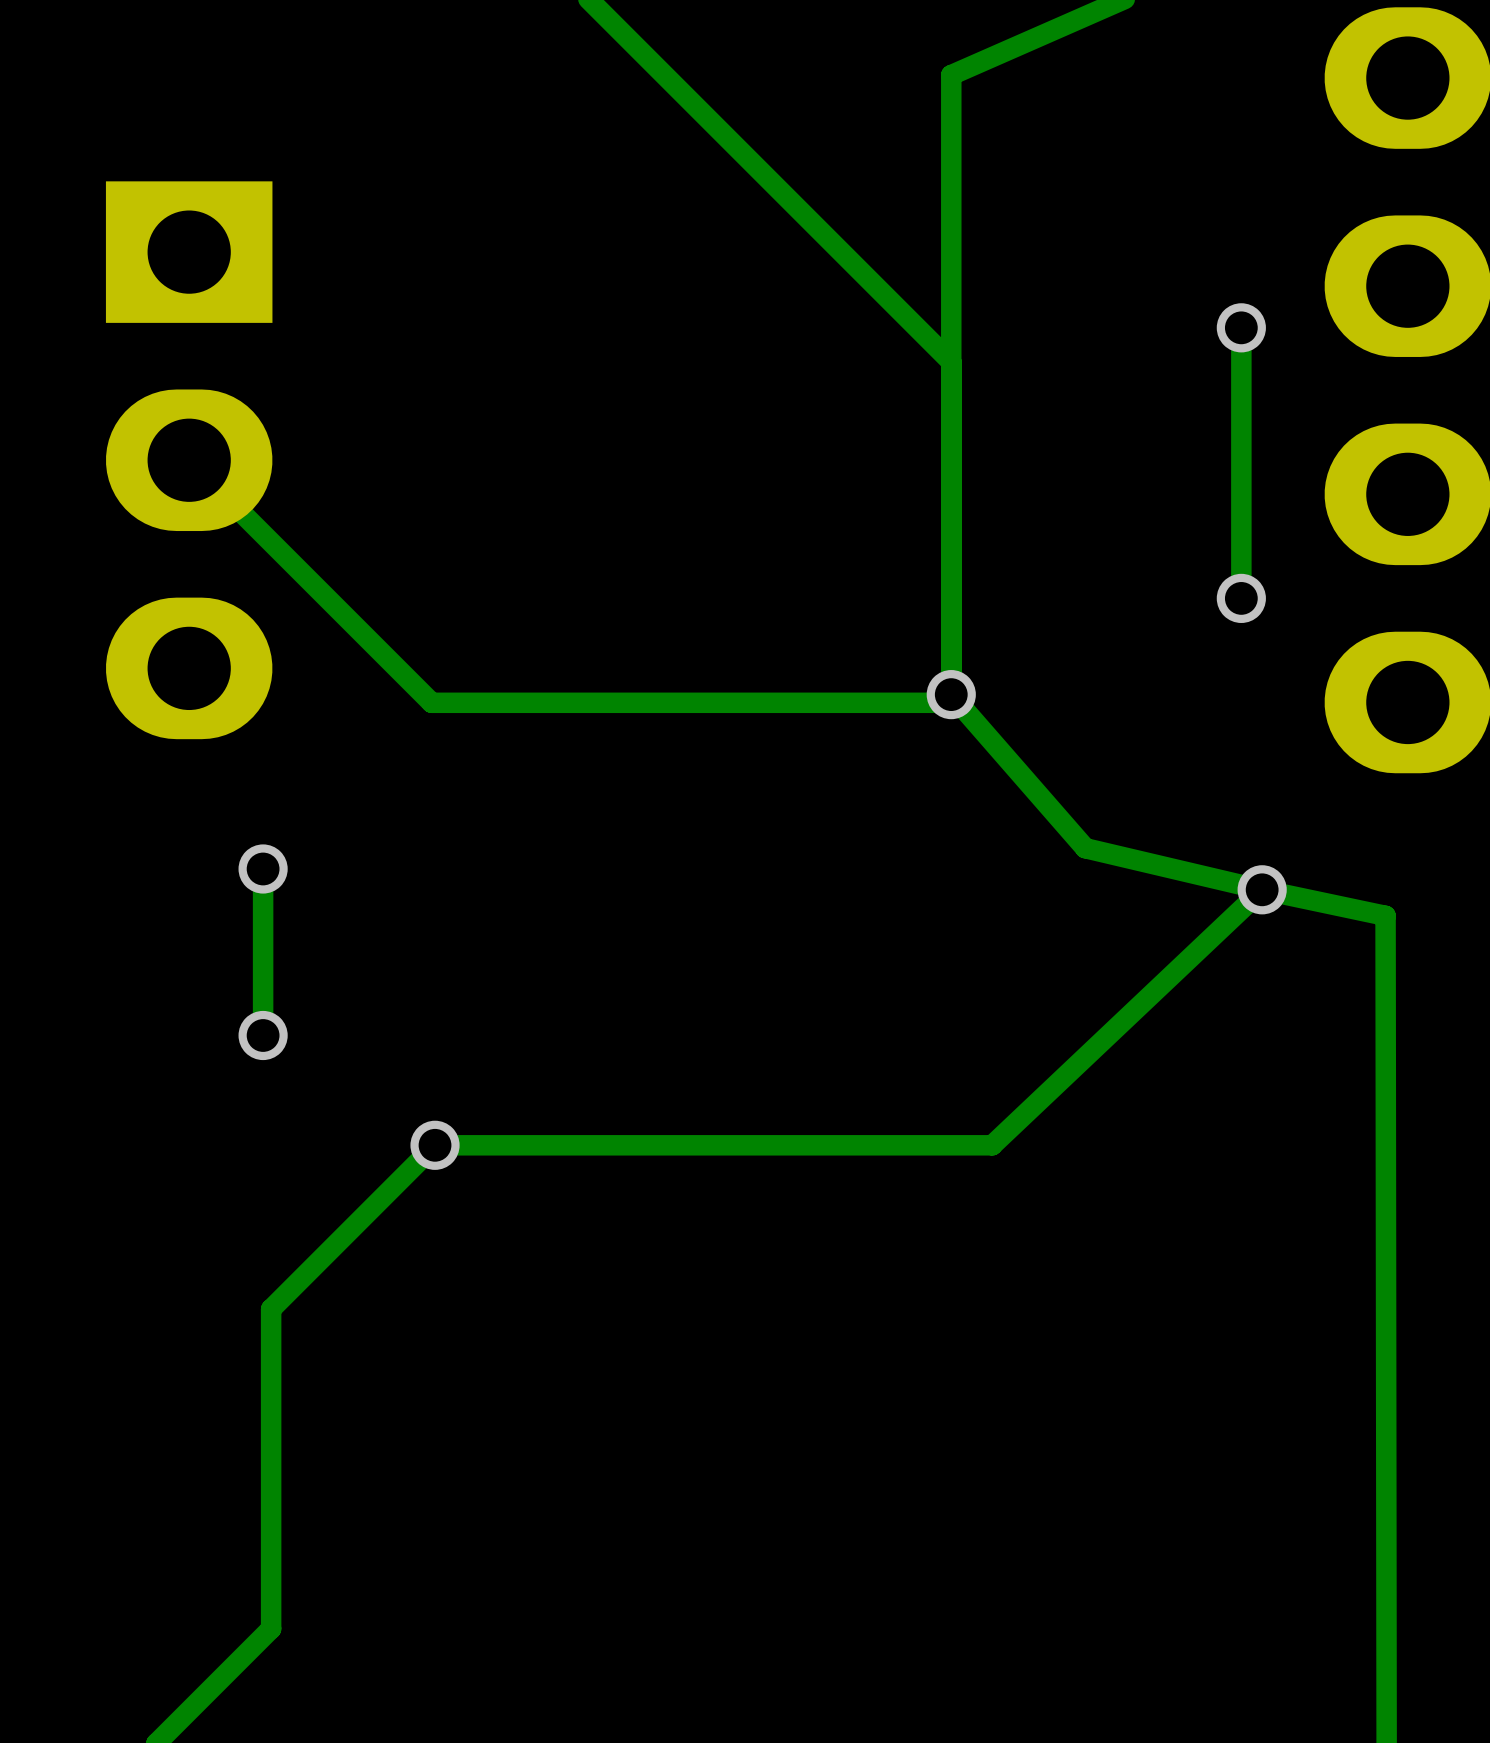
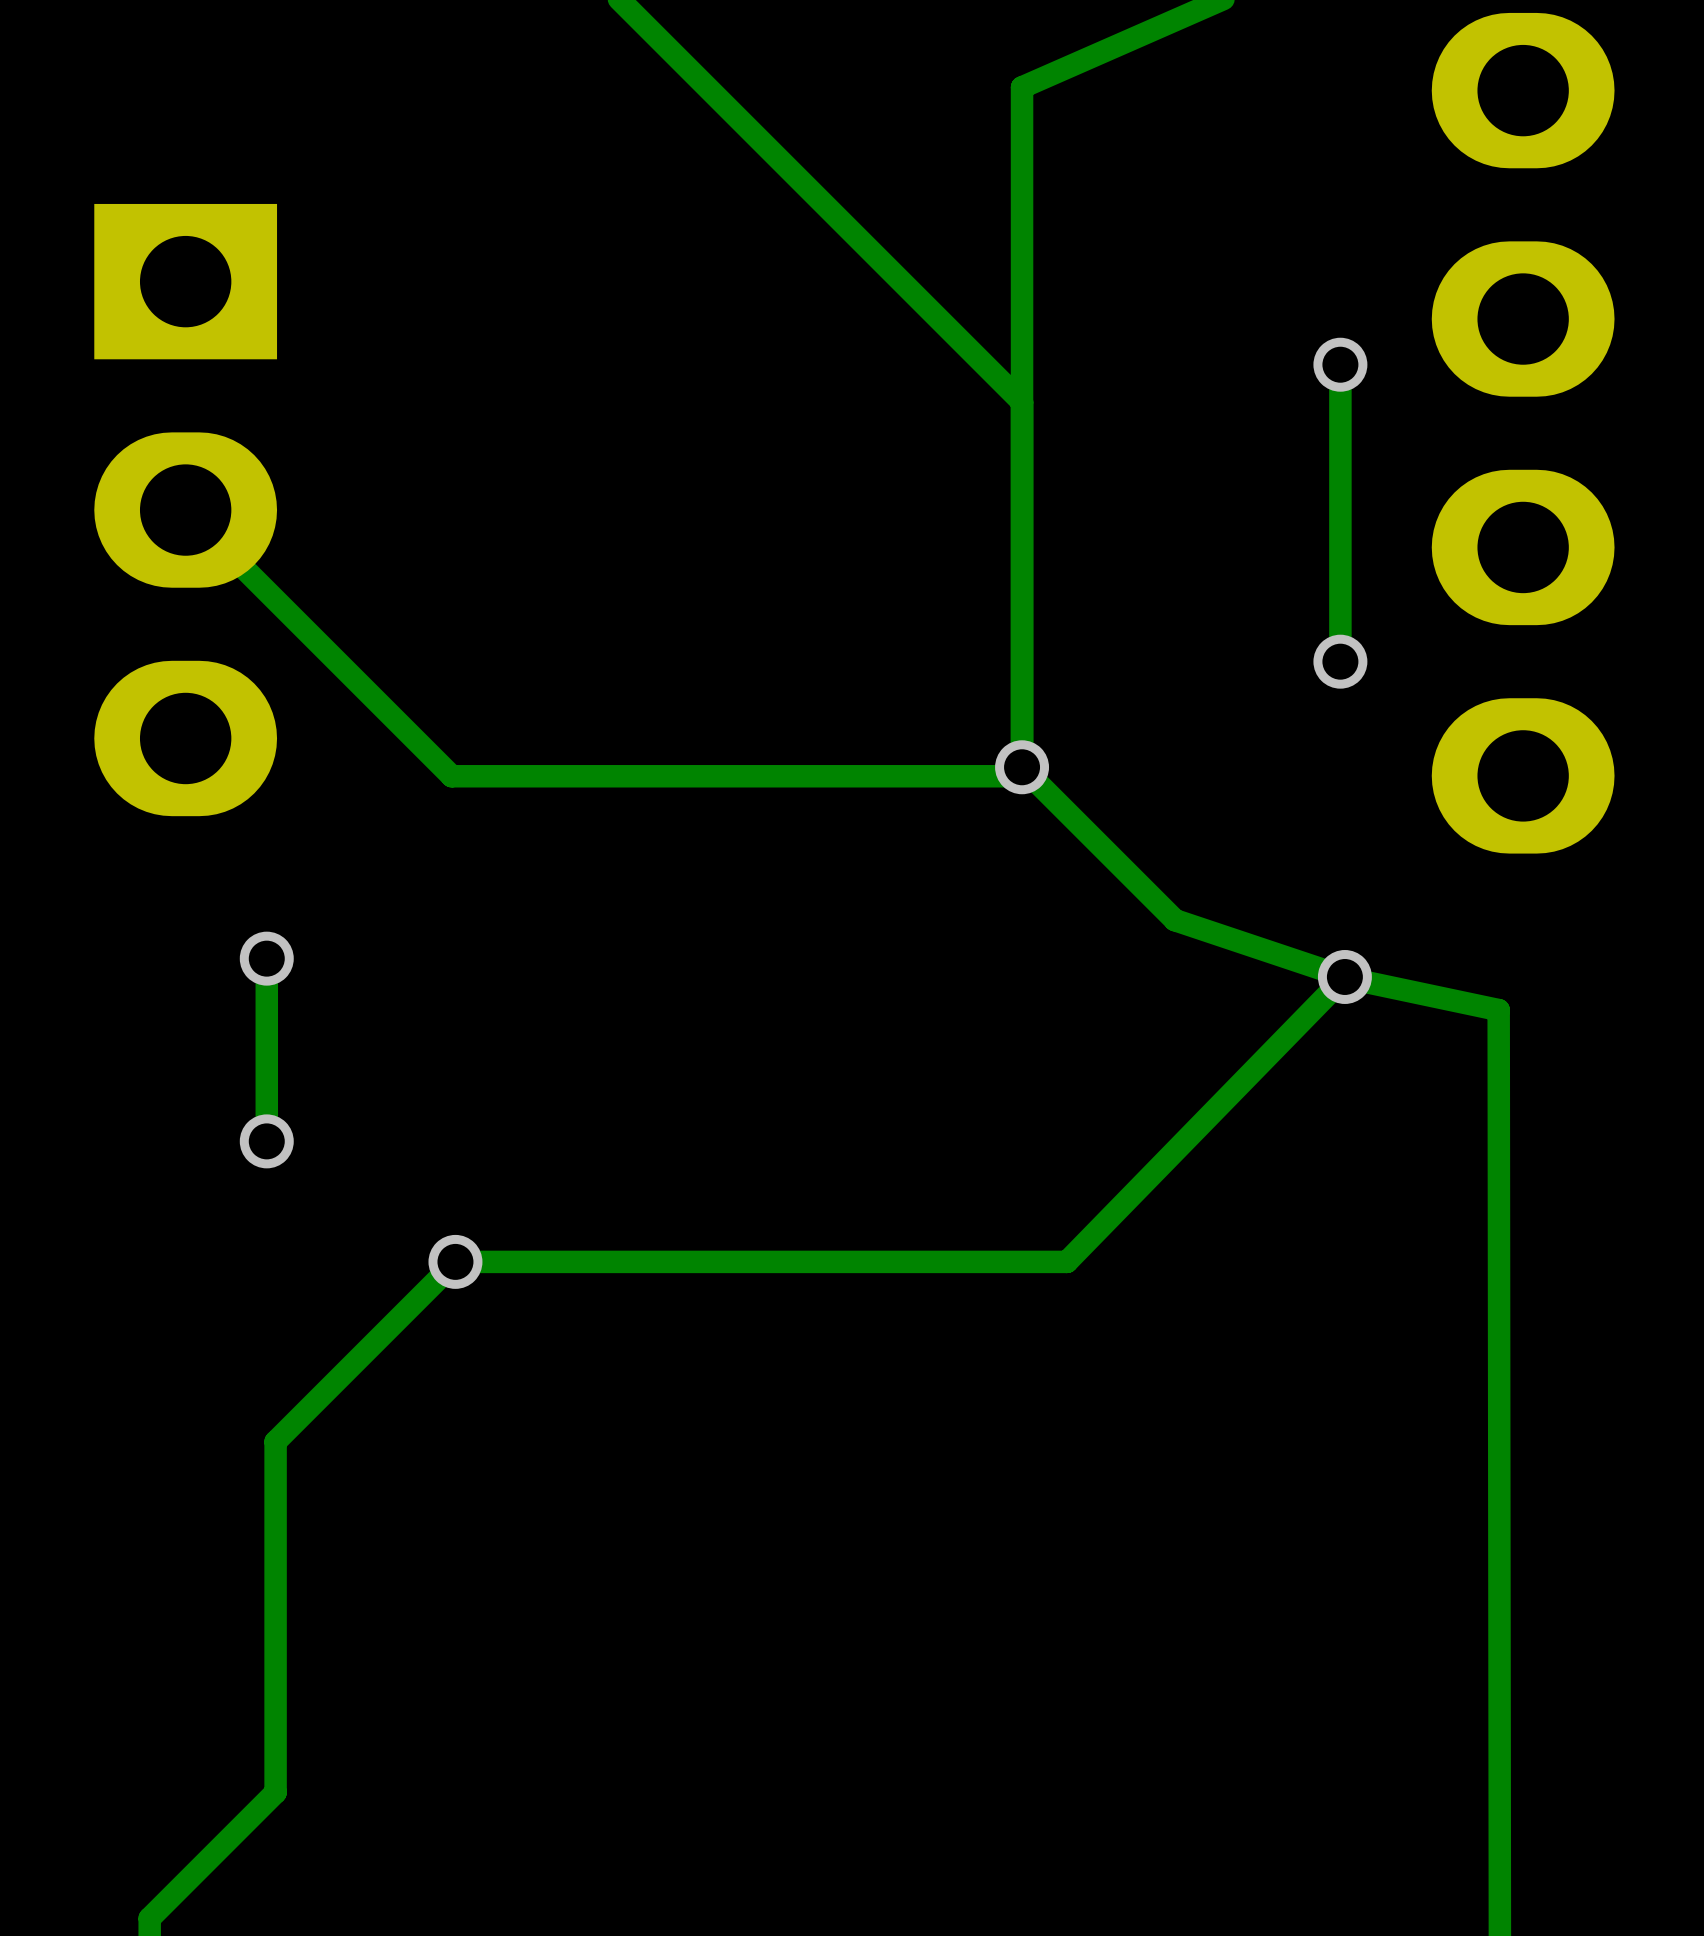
track: (951, 694) (1085, 848) (1262, 889) (992, 1145) -> (1022, 767) (1174, 920) (1344, 976) (1067, 1261)
via position: (1262, 889) -> (1344, 976)

